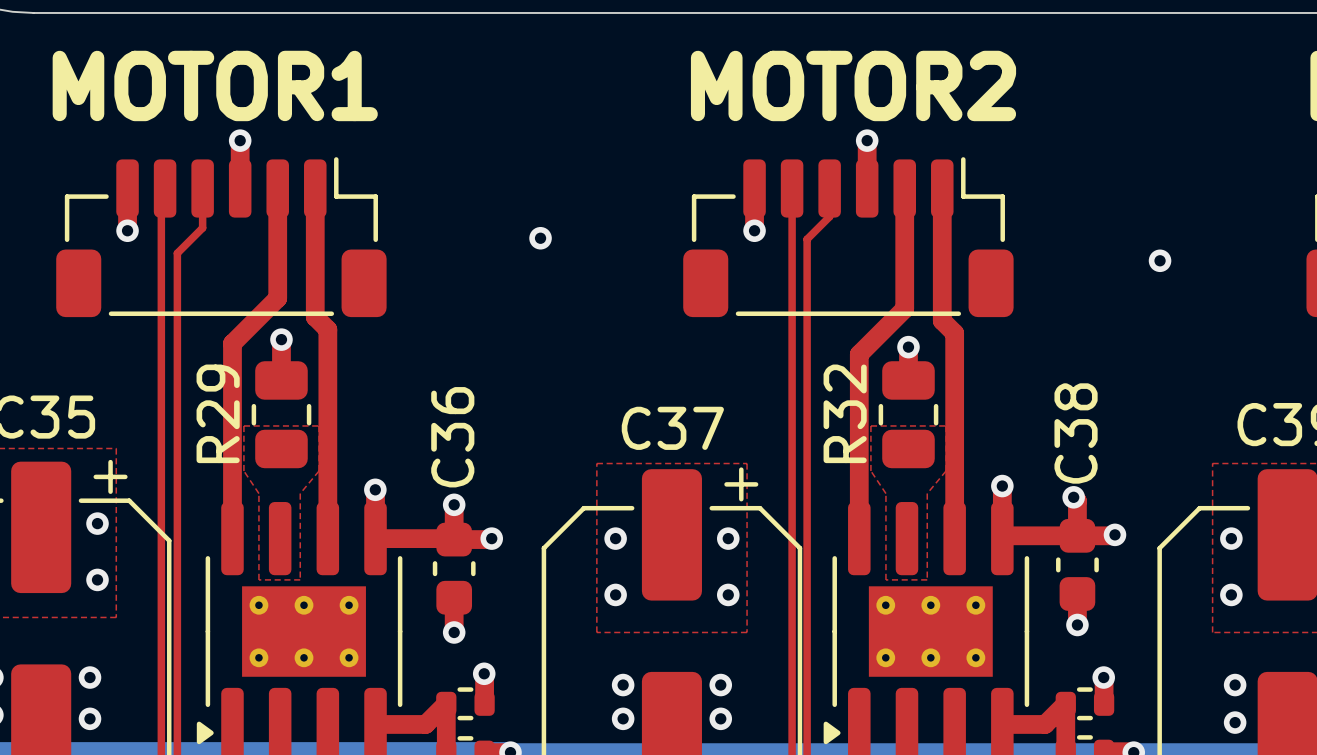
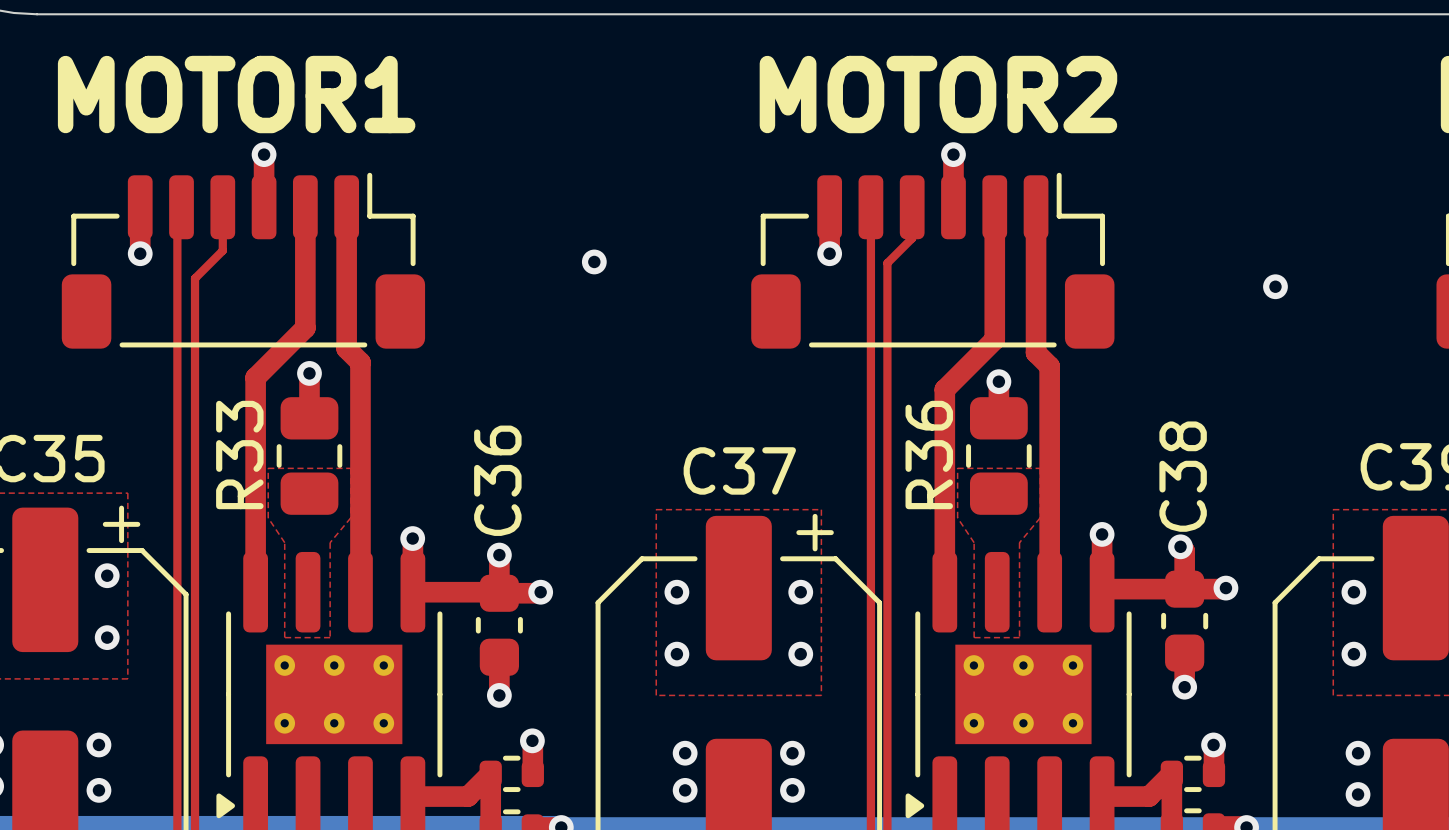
R29 name: R29 (218, 413) -> R33 (239, 455)
R32 name: R32 (845, 413) -> R36 (929, 455)

